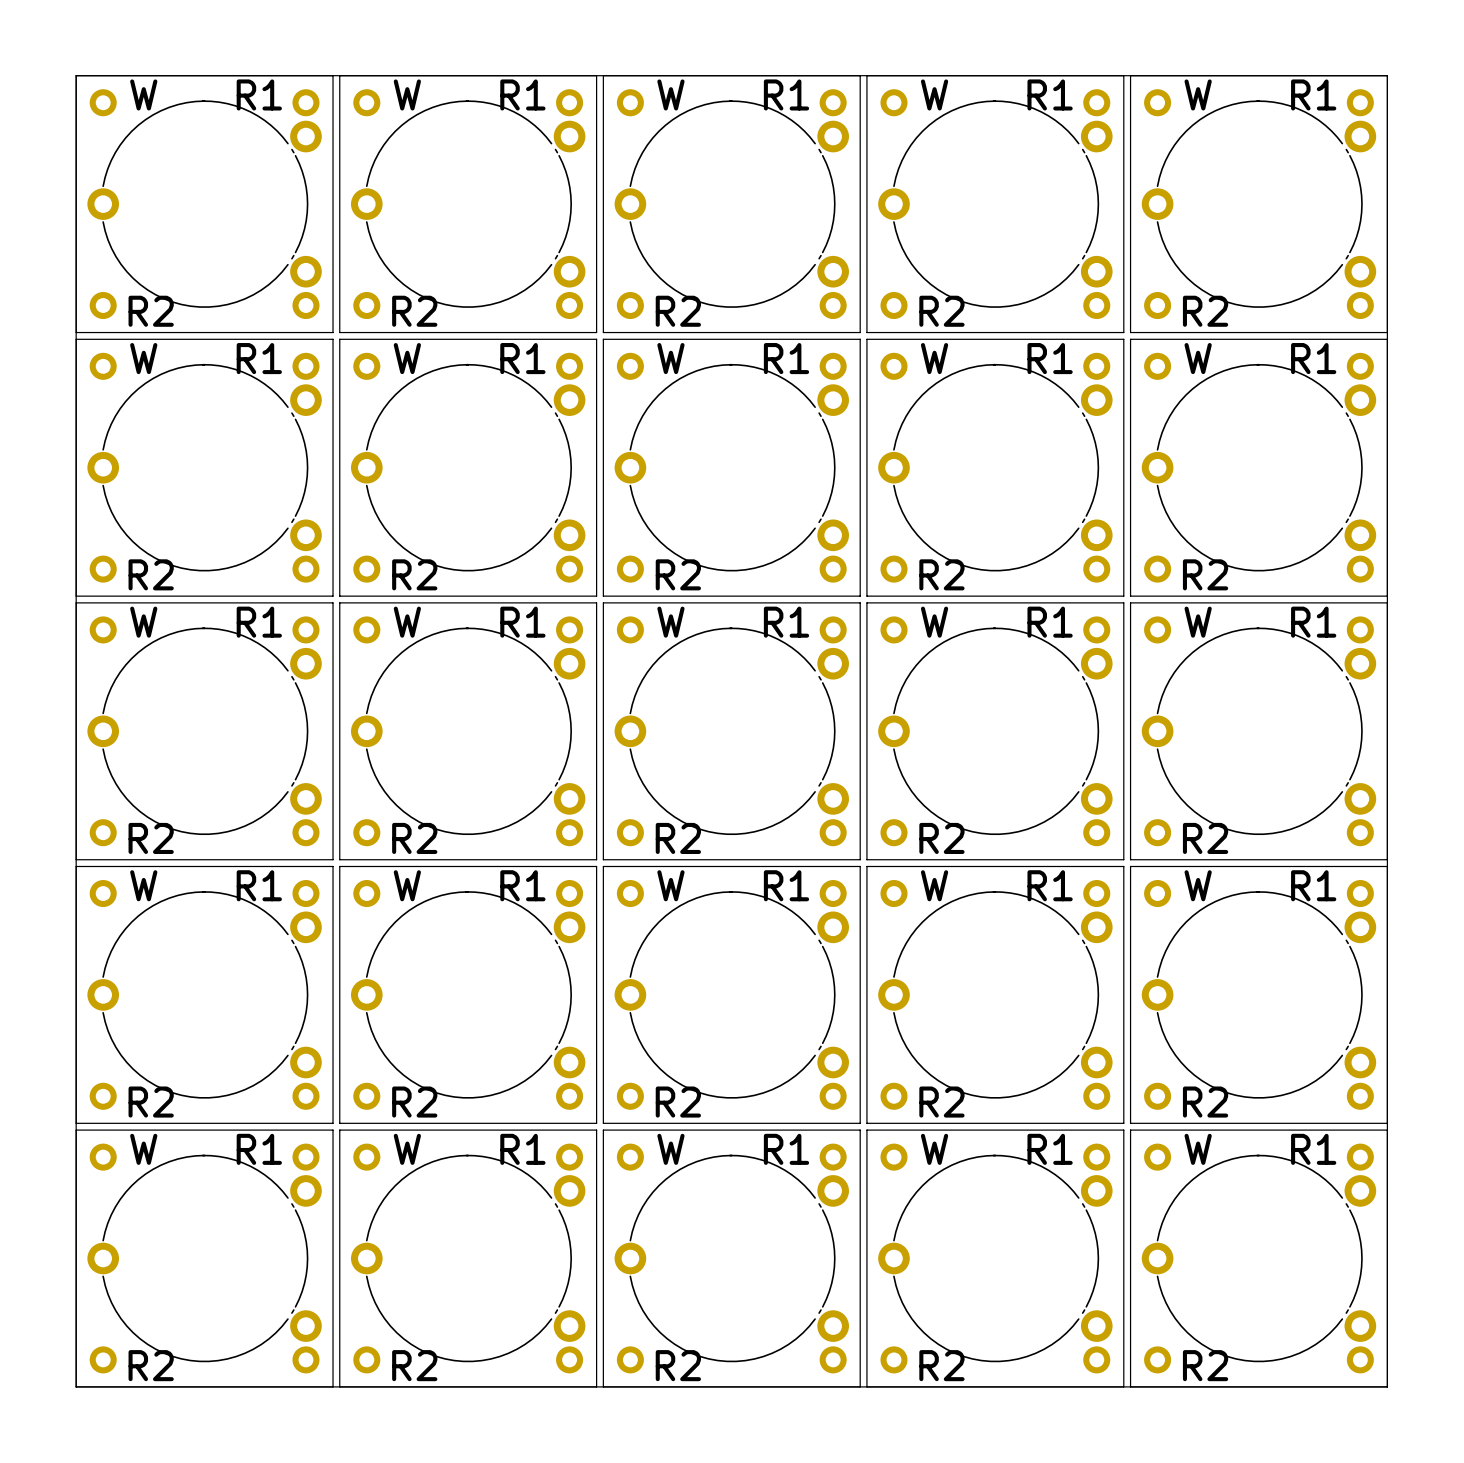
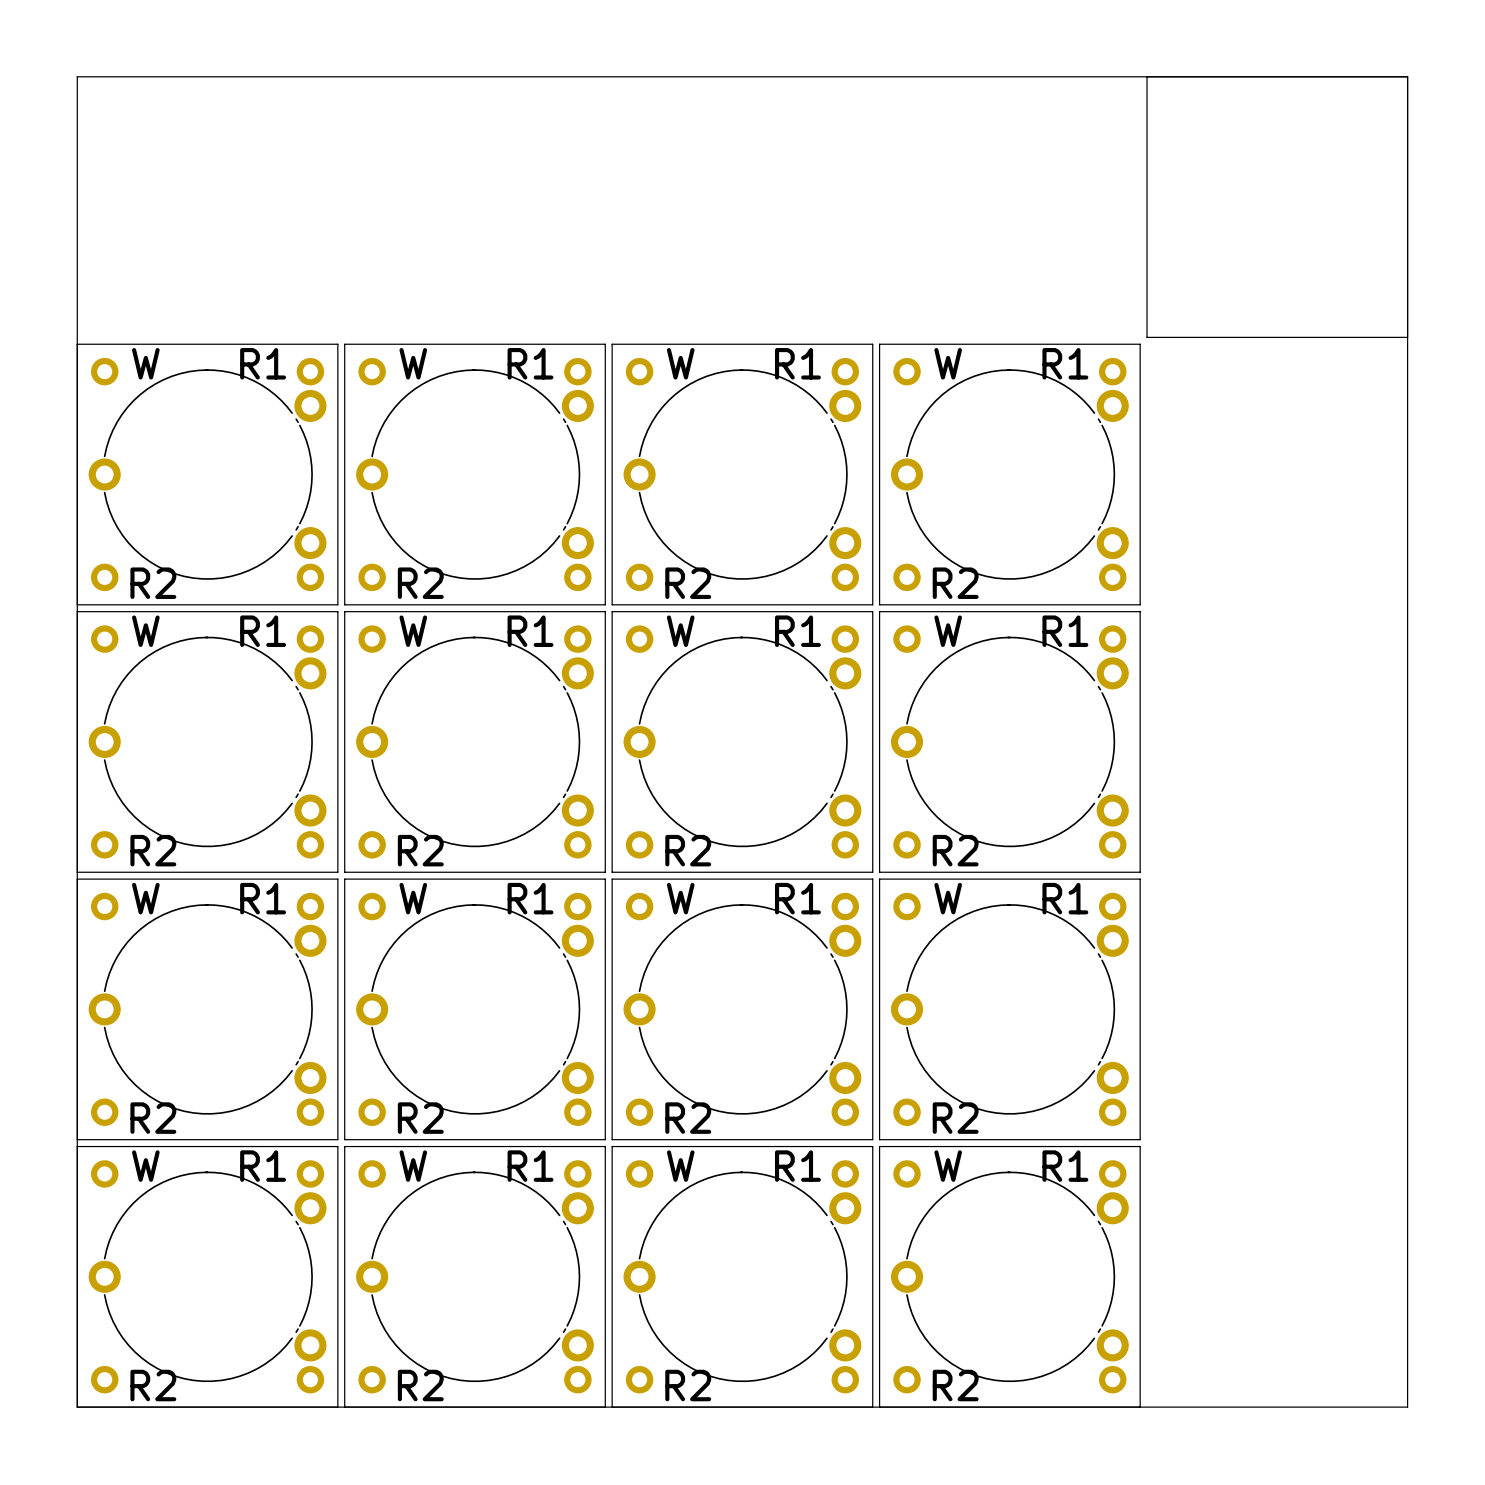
line: (76, 75) (333, 75) (333, 332) (76, 332) (76, 75) -> none
line: (339, 75) (596, 75) (596, 332) (339, 332) (339, 75) -> none
line: (603, 75) (860, 75) (860, 332) (603, 332) (603, 75) -> none
line: (866, 75) (866, 332) (1123, 332) (1123, 75) (866, 75) -> none
part: W (103, 102) -> none
part: R1 (305, 102) -> none
part: W (366, 102) -> none
part: R1 (569, 102) -> none
part: W (630, 102) -> none
part: R1 (833, 102) -> none
part: W (893, 102) -> none
part: R1 (1096, 102) -> none
part: W (1157, 102) -> none
part: R1 (1360, 102) -> none
part: (204, 204) -> none
part: (468, 204) -> none
part: (731, 204) -> none
part: (995, 204) -> none
part: (1258, 204) -> none
part: R2 (103, 305) -> none
part: (305, 305) -> none
part: R2 (366, 305) -> none
part: (569, 305) -> none
part: R2 (630, 305) -> none
part: (833, 305) -> none
part: R2 (893, 305) -> none
part: (1096, 305) -> none
part: R2 (1157, 305) -> none
part: (1360, 305) -> none
line: (1130, 339) (1387, 339) (1387, 596) (1130, 596) (1130, 339) -> none
part: W (1157, 366) -> none
part: R1 (1360, 366) -> none
part: (1258, 467) -> none
part: R2 (1157, 569) -> none
part: (1360, 569) -> none
line: (1130, 602) (1387, 602) (1387, 859) (1130, 859) (1130, 602) -> none
part: W (1157, 629) -> none
part: R1 (1360, 629) -> none
part: (1258, 731) -> none
part: R2 (1157, 832) -> none
part: (1360, 832) -> none
line: (1130, 866) (1387, 866) (1387, 1123) (1130, 1123) (1130, 866) -> none
part: W (1157, 893) -> none
part: R1 (1360, 893) -> none
part: (1258, 994) -> none
part: R2 (1157, 1096) -> none
part: (1360, 1096) -> none
line: (1130, 1130) (1387, 1130) (1387, 1386) (1130, 1386) (1130, 1130) -> none
part: W (1157, 1157) -> none
part: R1 (1360, 1157) -> none
part: (1258, 1258) -> none
part: R2 (1157, 1359) -> none
part: (1360, 1359) -> none

